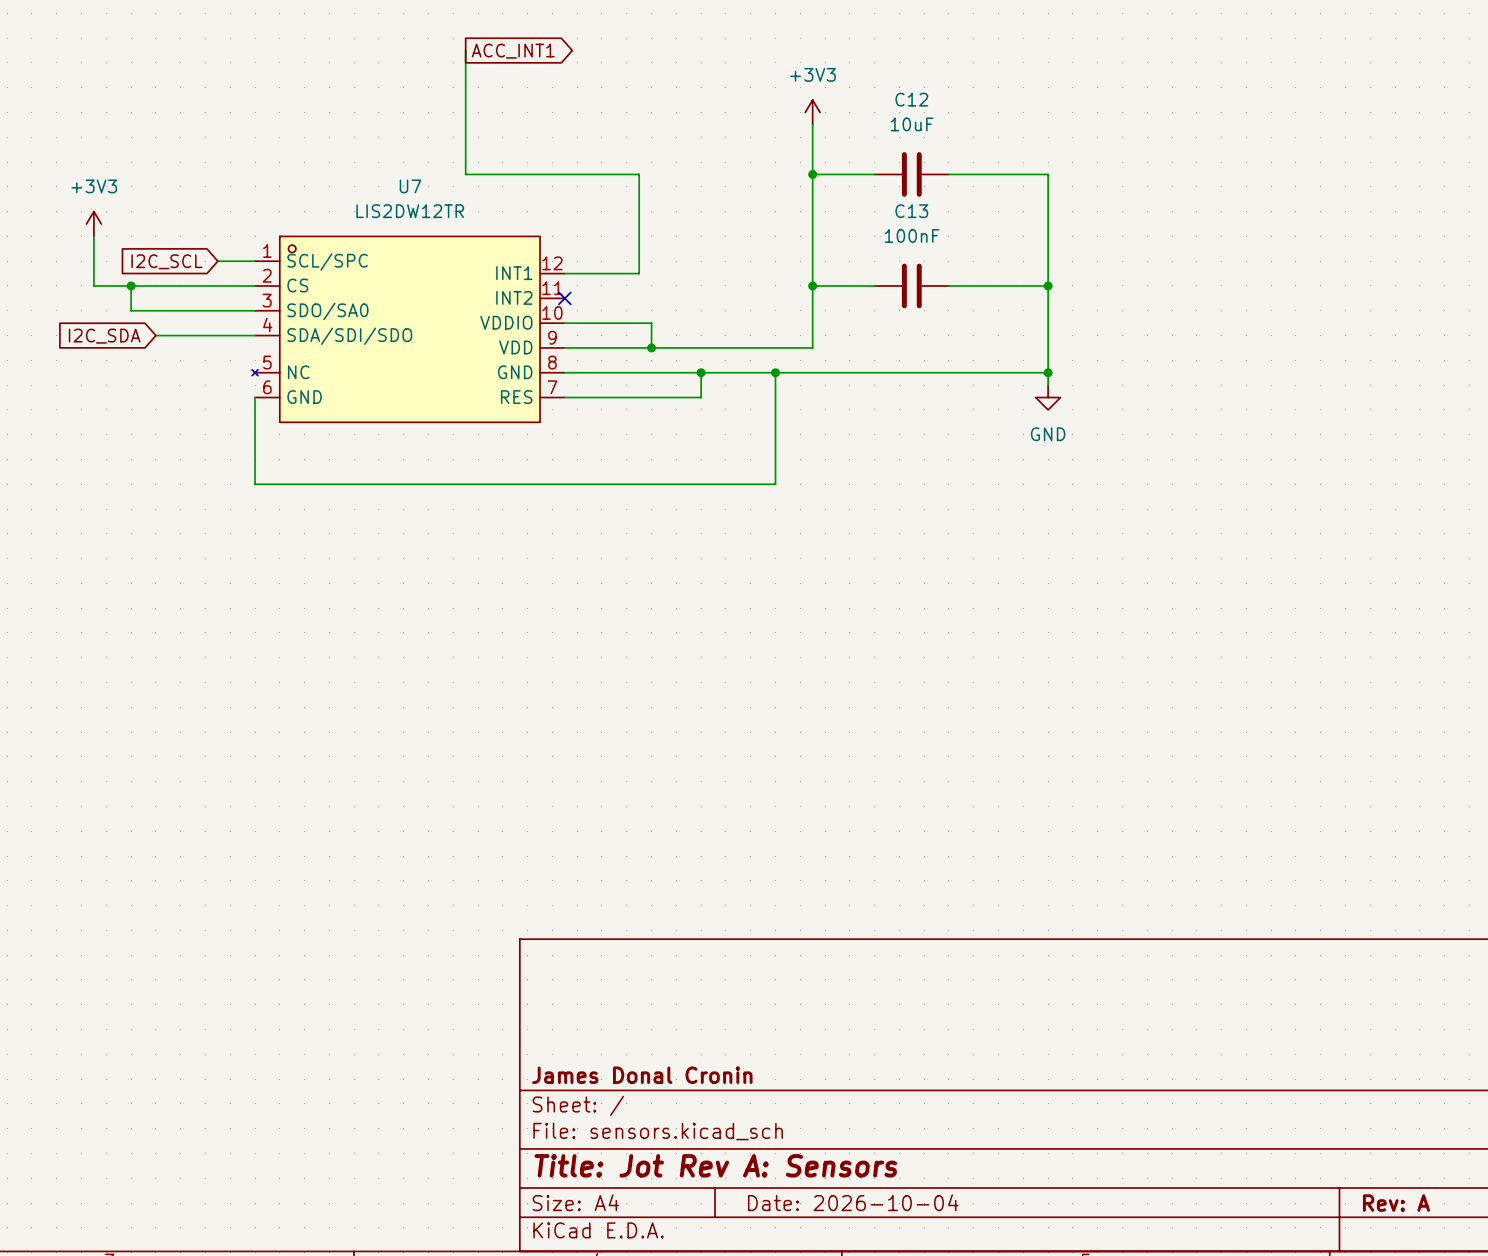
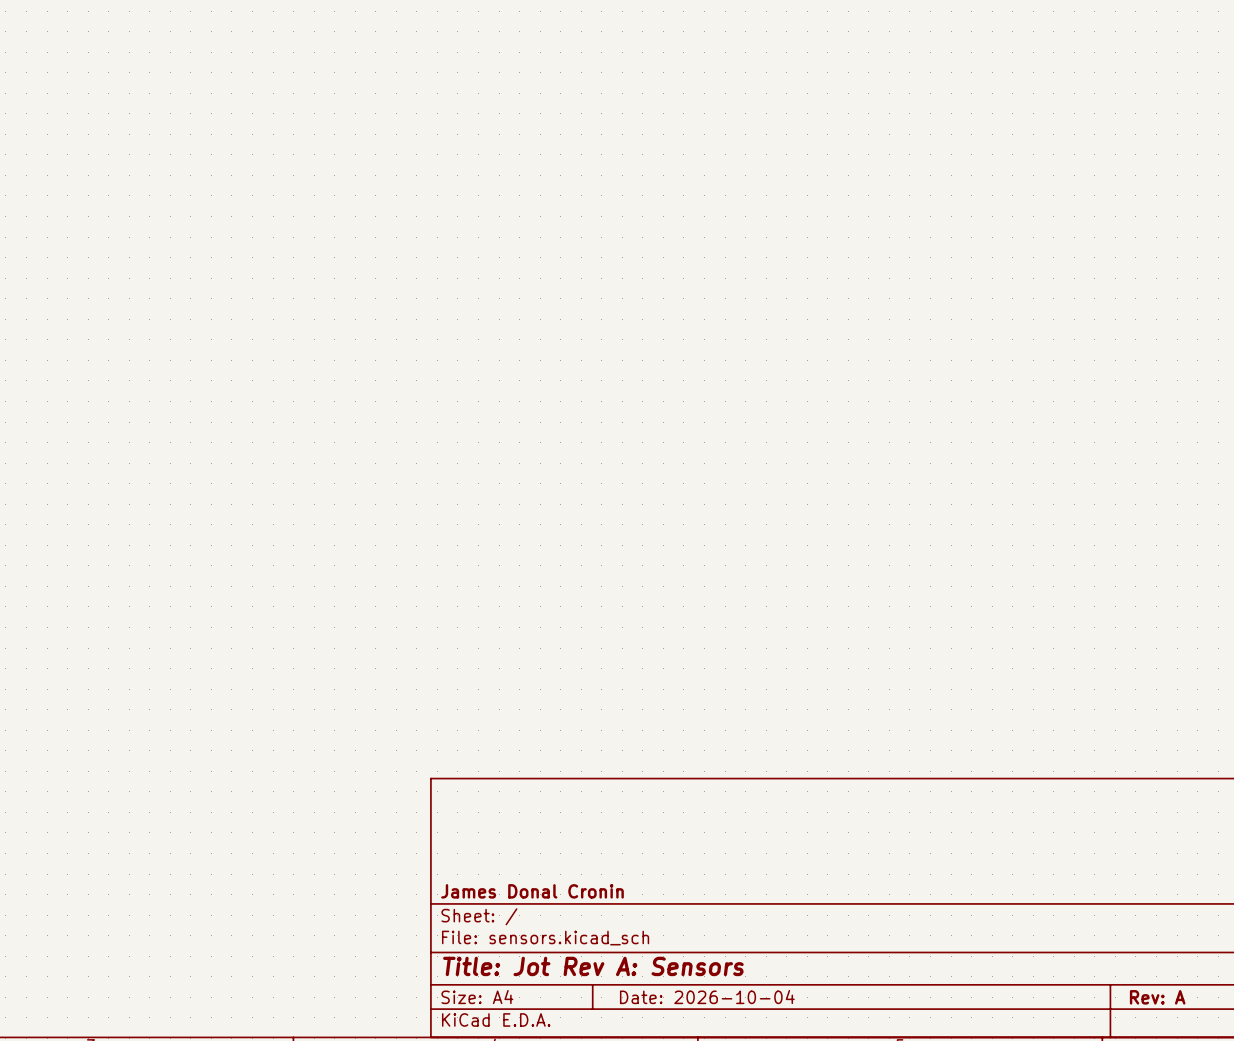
wire: (465, 50) (465, 174) (639, 174) (639, 273) (564, 273) -> none
global label: ACC_INT1 (513, 51) -> none
power symbol: +3V3 (812, 112) -> none
wire: (812, 124) (812, 347) (564, 347) -> none
wire: (812, 174) (874, 174) -> none
junction: (812, 174) -> none
C12: 10uF (911, 174) -> none
wire: (948, 174) (1048, 174) (1048, 385) -> none
power symbol: +3V3 (93, 224) -> none
wire: (93, 236) (93, 285) (255, 285) -> none
global label: I2C_SCL (166, 261) -> none
wire: (217, 261) (255, 261) -> none
wire: (131, 285) (131, 310) (255, 310) -> none
junction: (131, 285) -> none
wire: (812, 285) (874, 285) -> none
junction: (812, 285) -> none
C13: 100nF (911, 285) -> none
wire: (948, 285) (1048, 285) -> none
junction: (1048, 285) -> none
no-connect mark: (564, 298) -> none
wire: (564, 323) (651, 323) (651, 347) -> none
U7: LIS2DW12TR (408, 329) -> none
wire: (155, 335) (255, 335) -> none
global label: I2C_SDA (104, 336) -> none
junction: (651, 347) -> none
wire: (564, 372) (1048, 372) -> none
wire: (701, 372) (701, 397) (564, 397) -> none
junction: (701, 372) -> none
wire: (775, 372) (775, 484) (255, 484) (255, 397) -> none
junction: (775, 372) -> none
junction: (1048, 372) -> none
power symbol: GND (1048, 397) -> none

